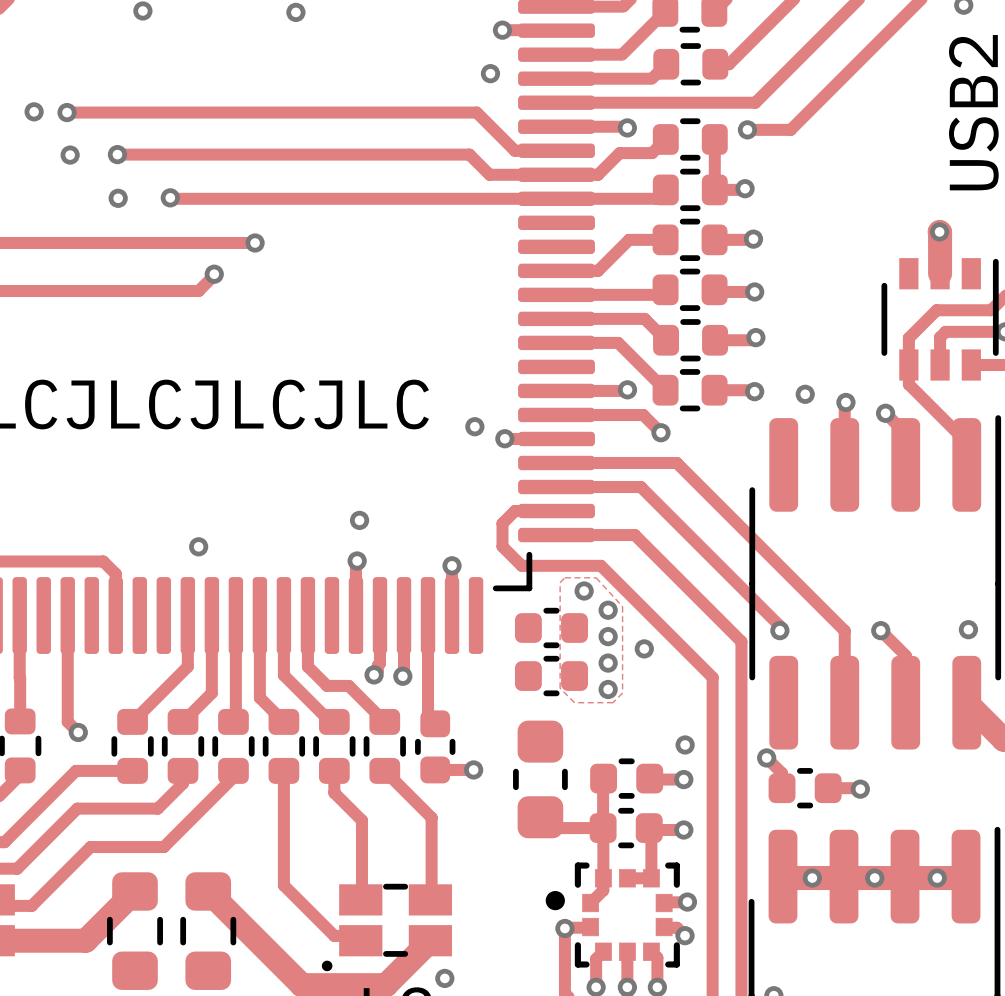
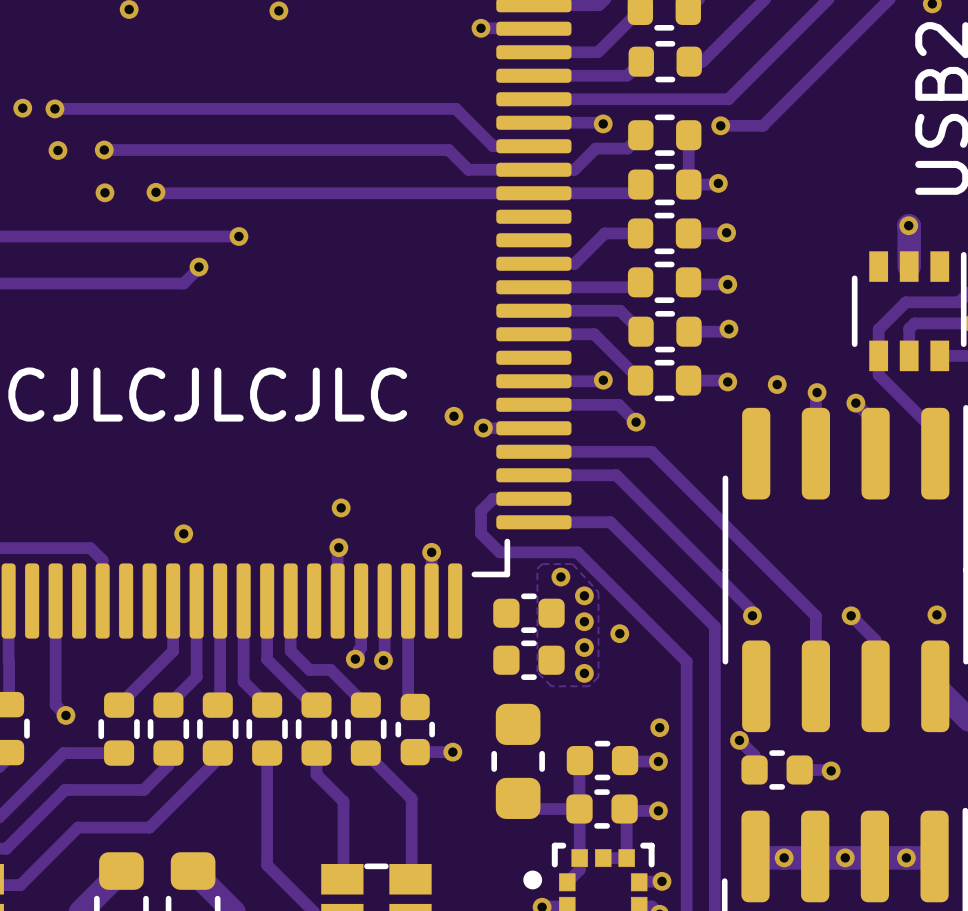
via: (490, 73) -> none

